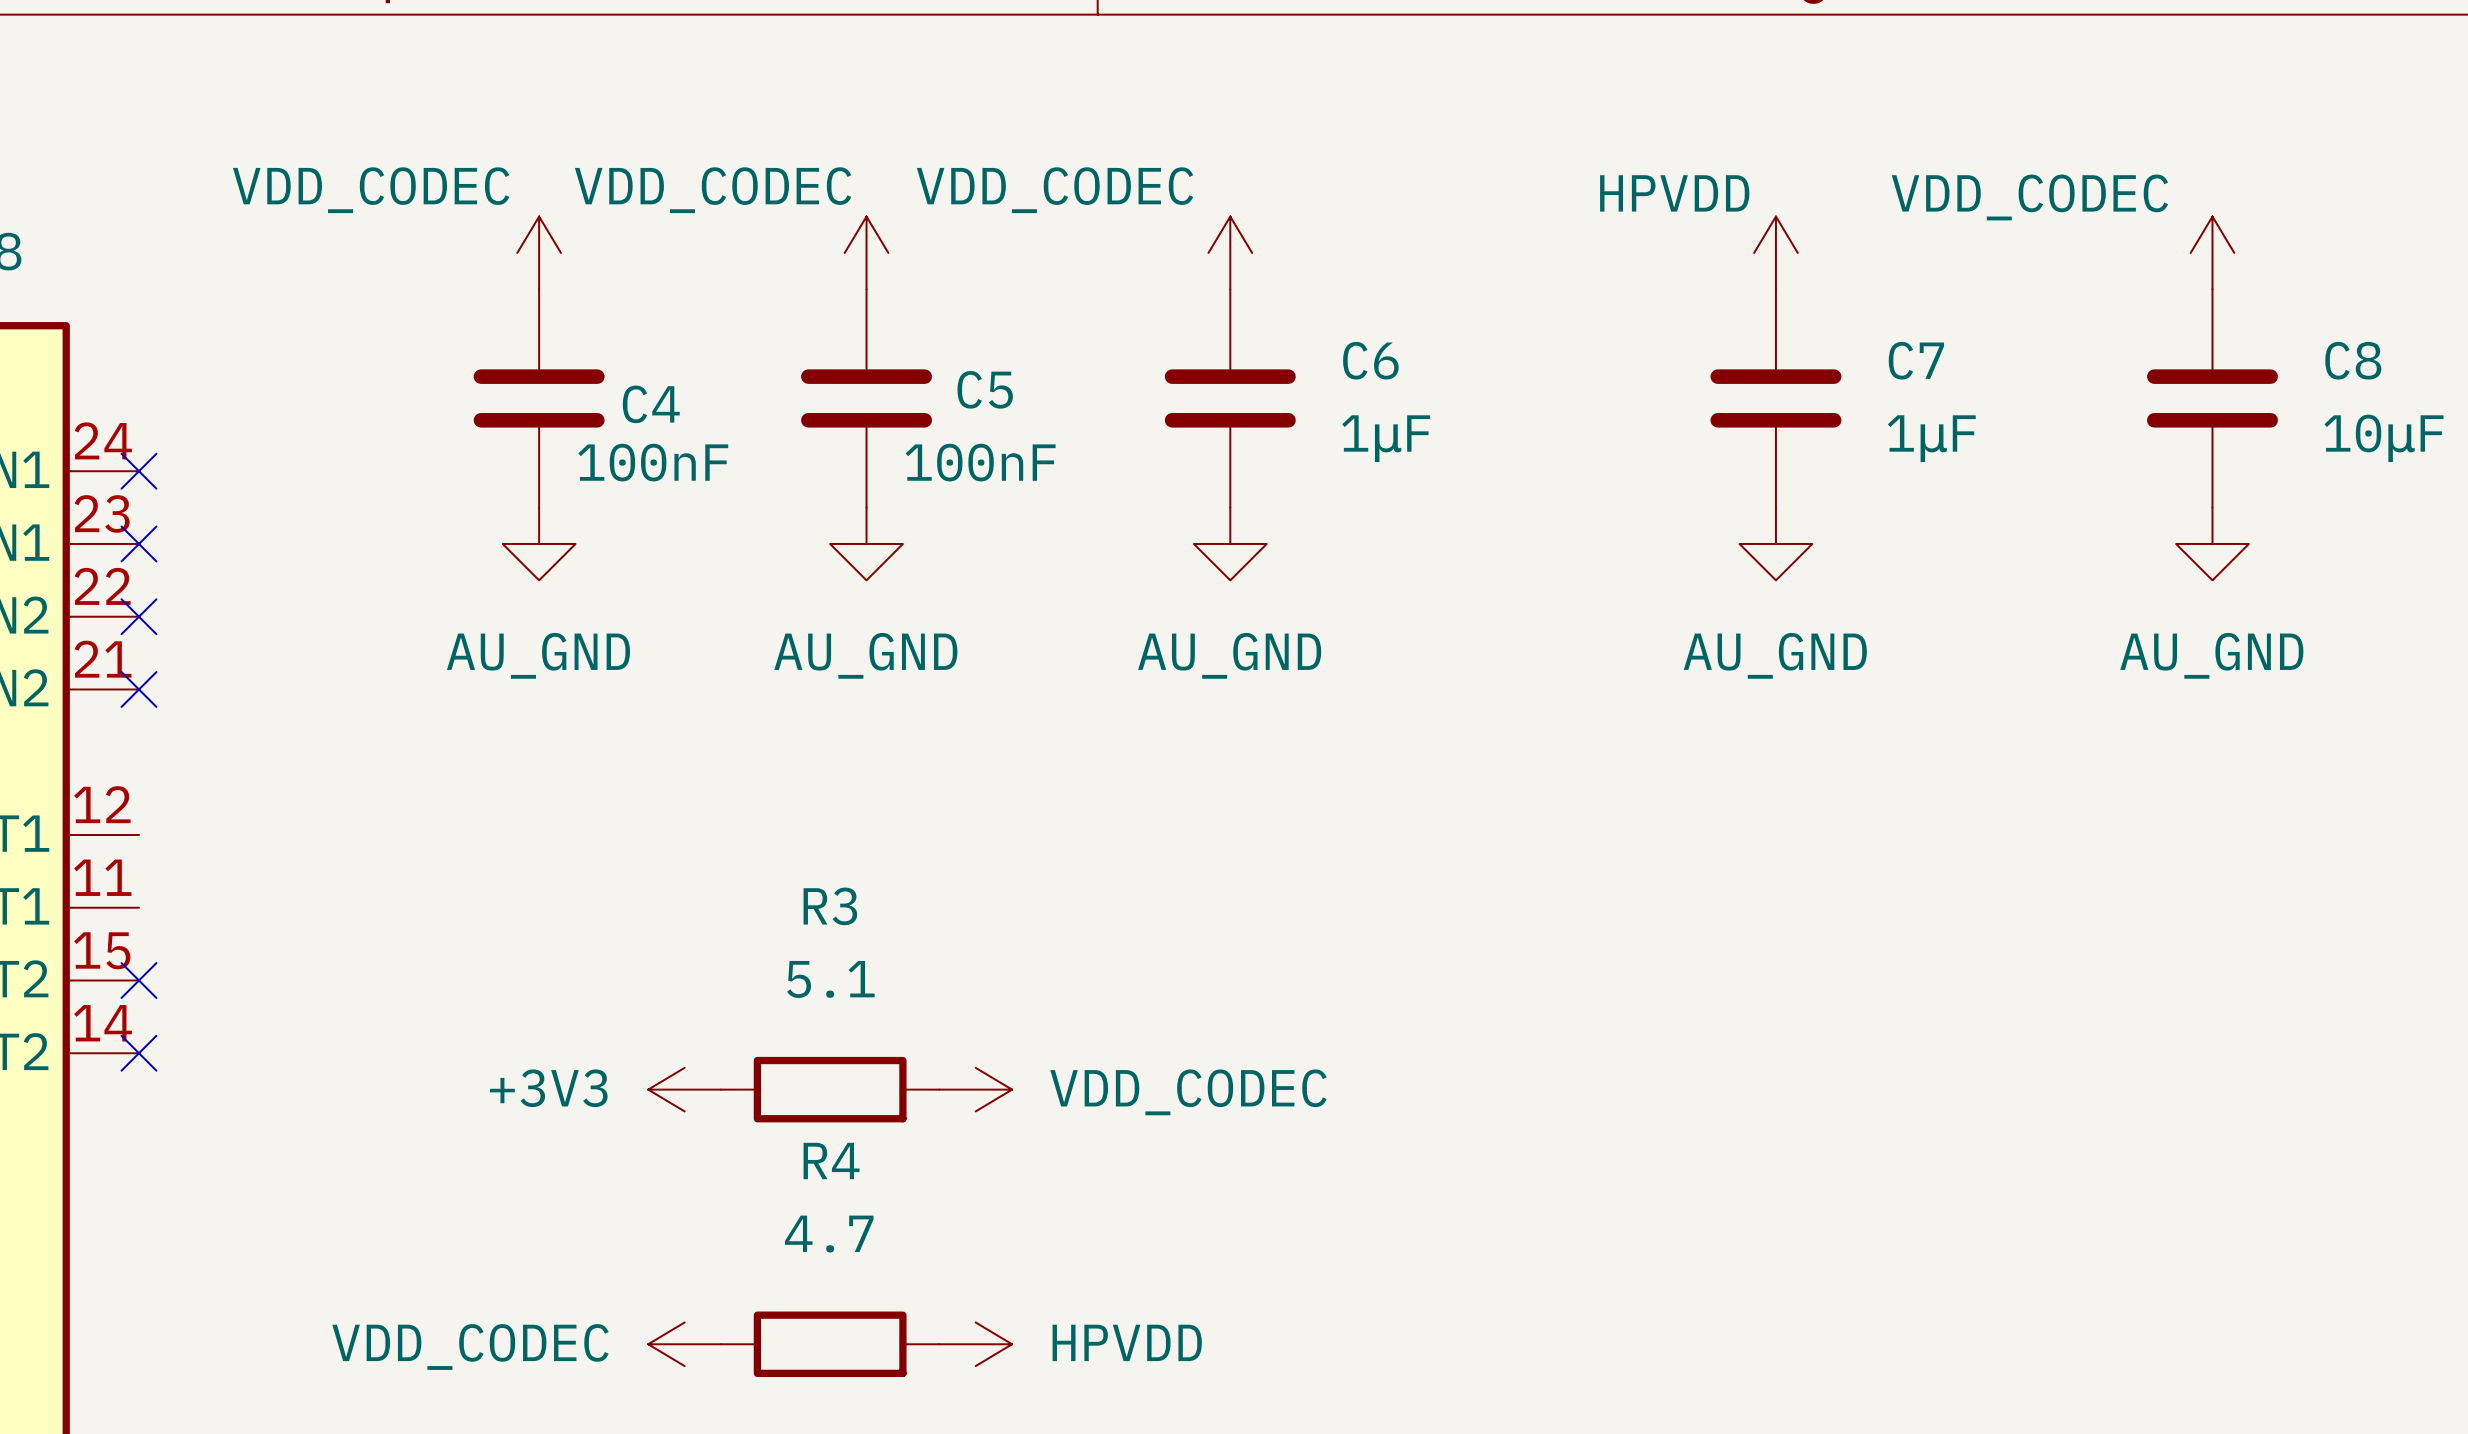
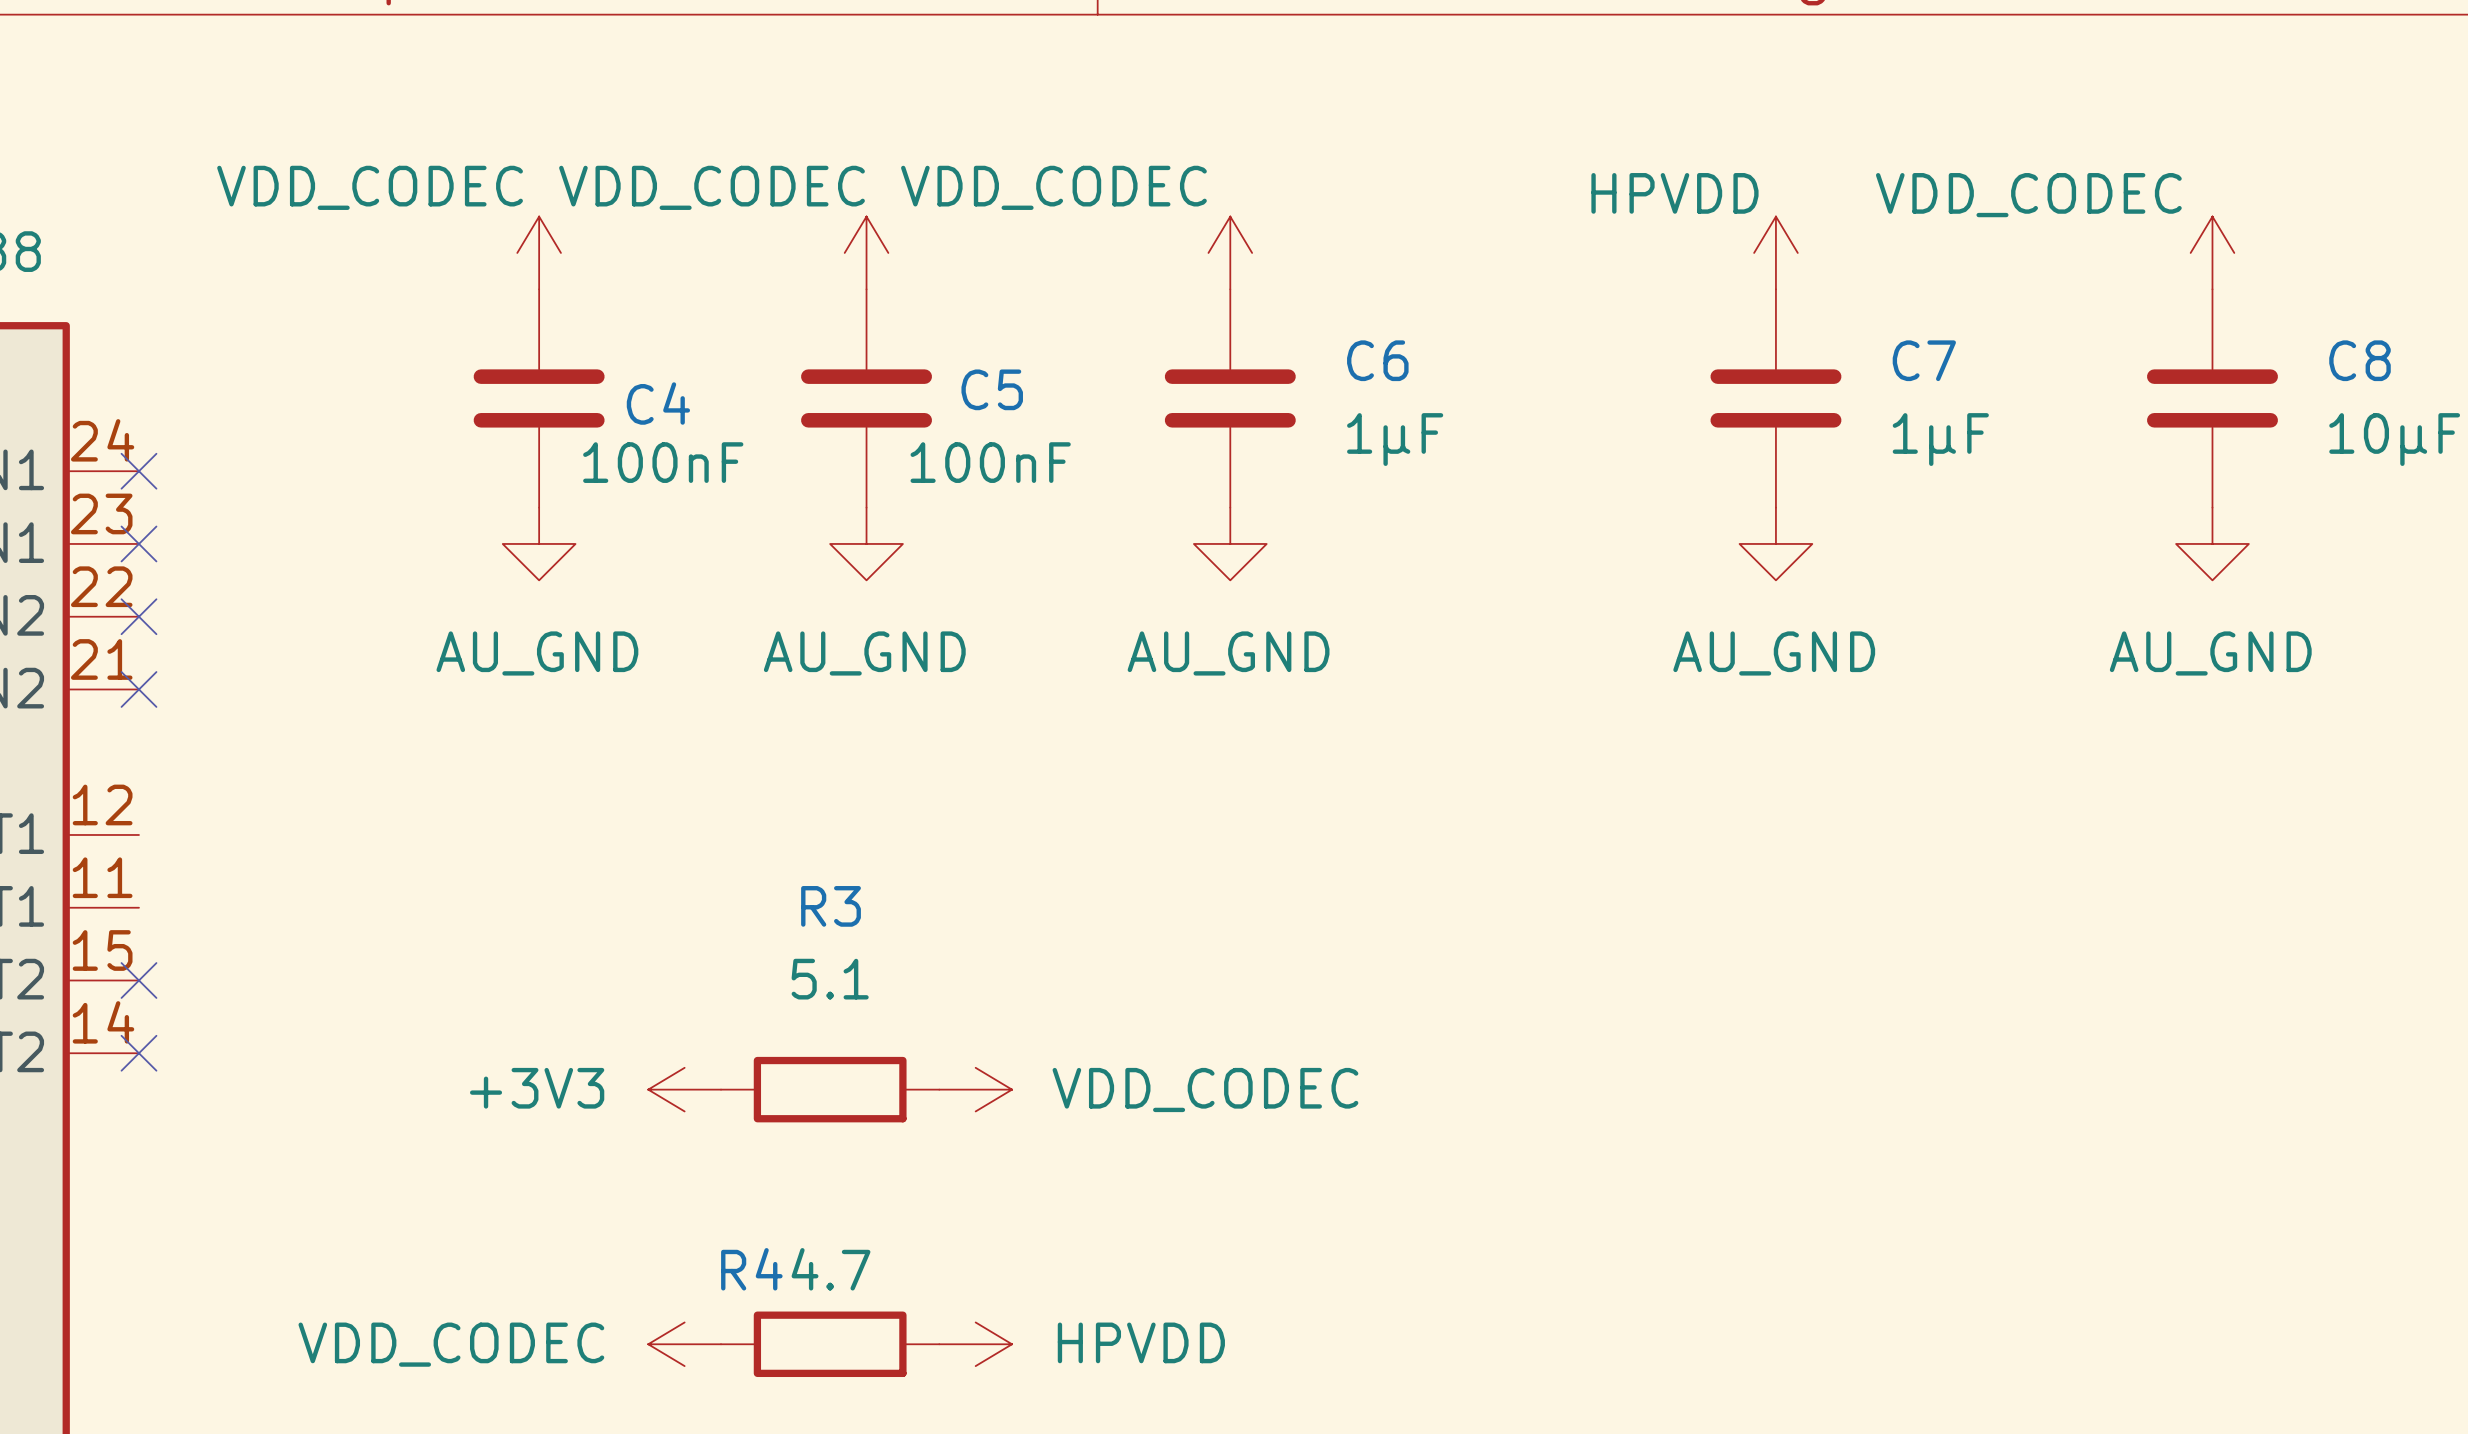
R4 name position: R4 (831, 1161) -> R4 (751, 1269)
R4 value position: 4.7 (829, 1234) -> 4.7 (831, 1269)

